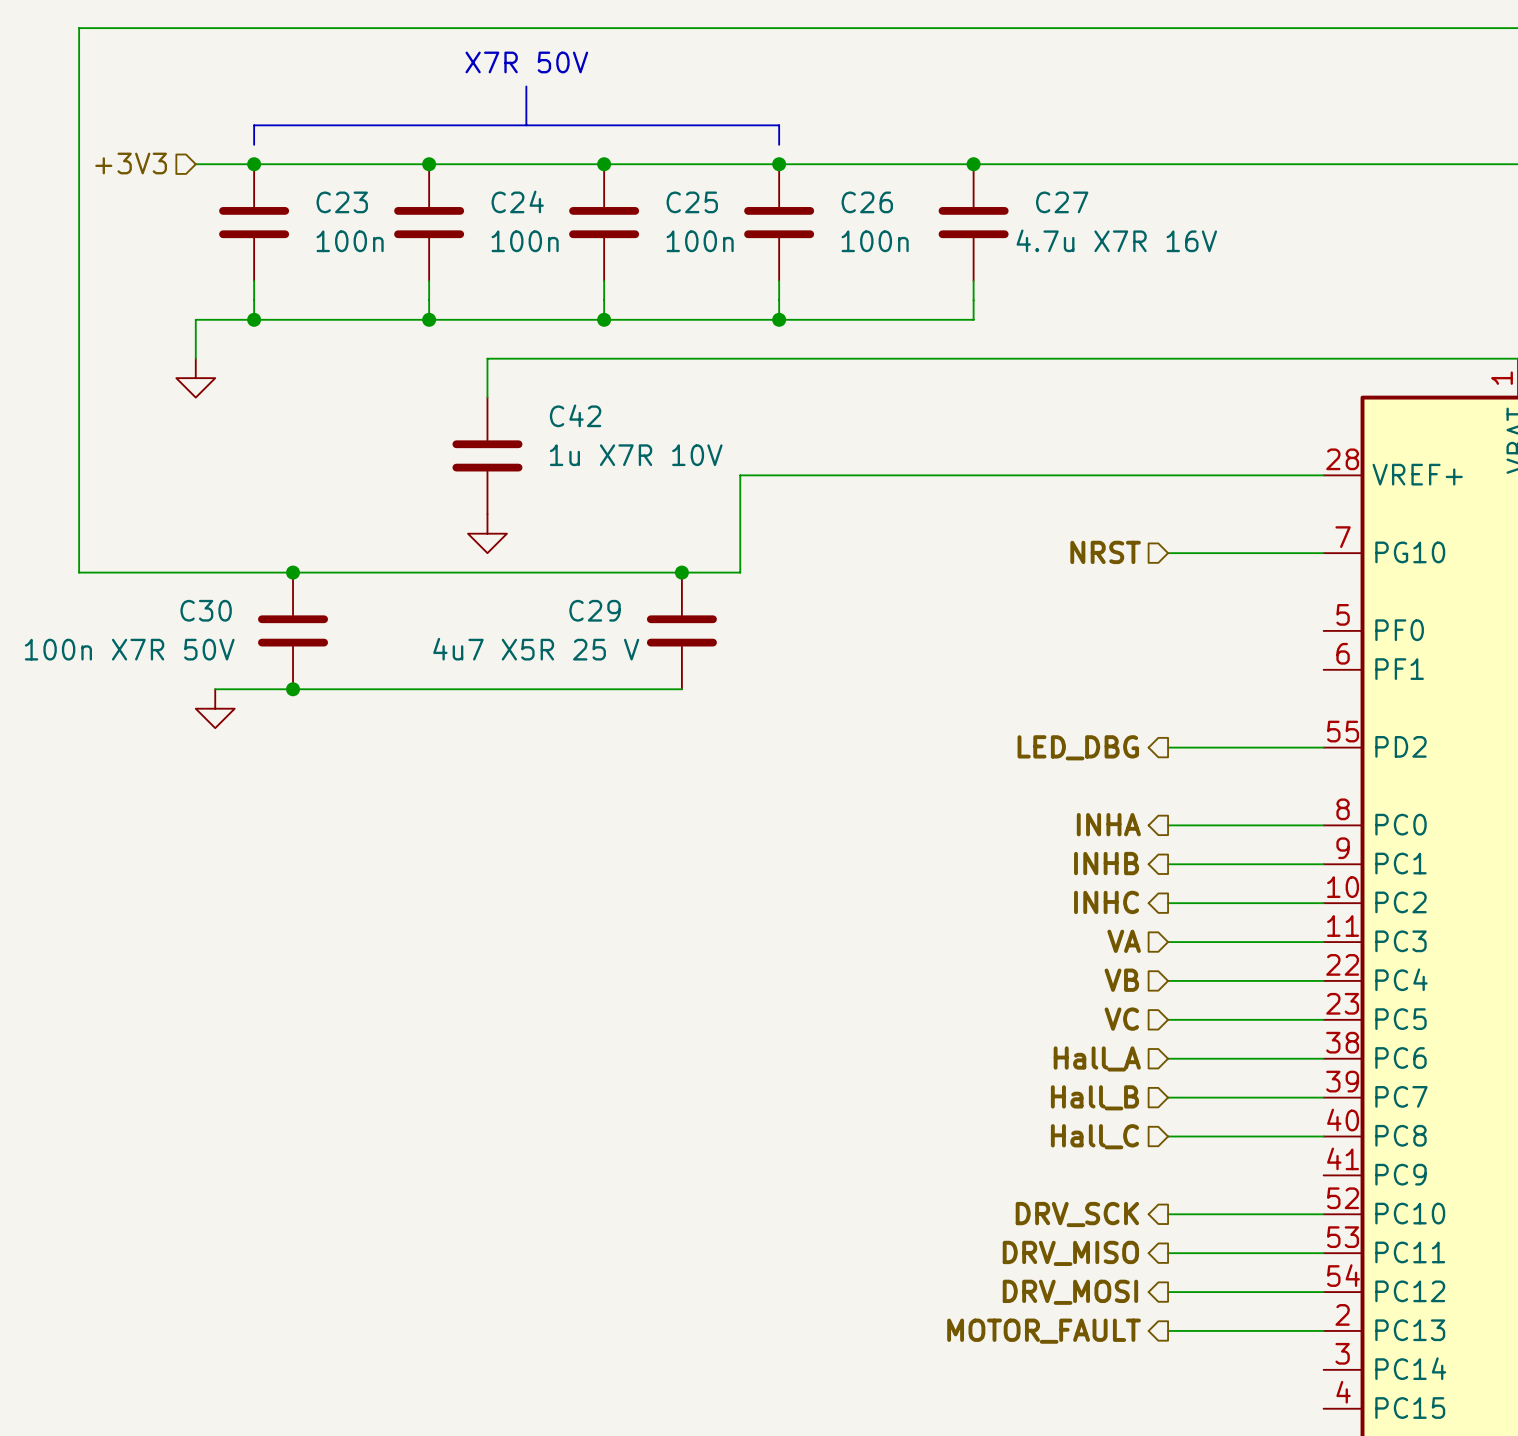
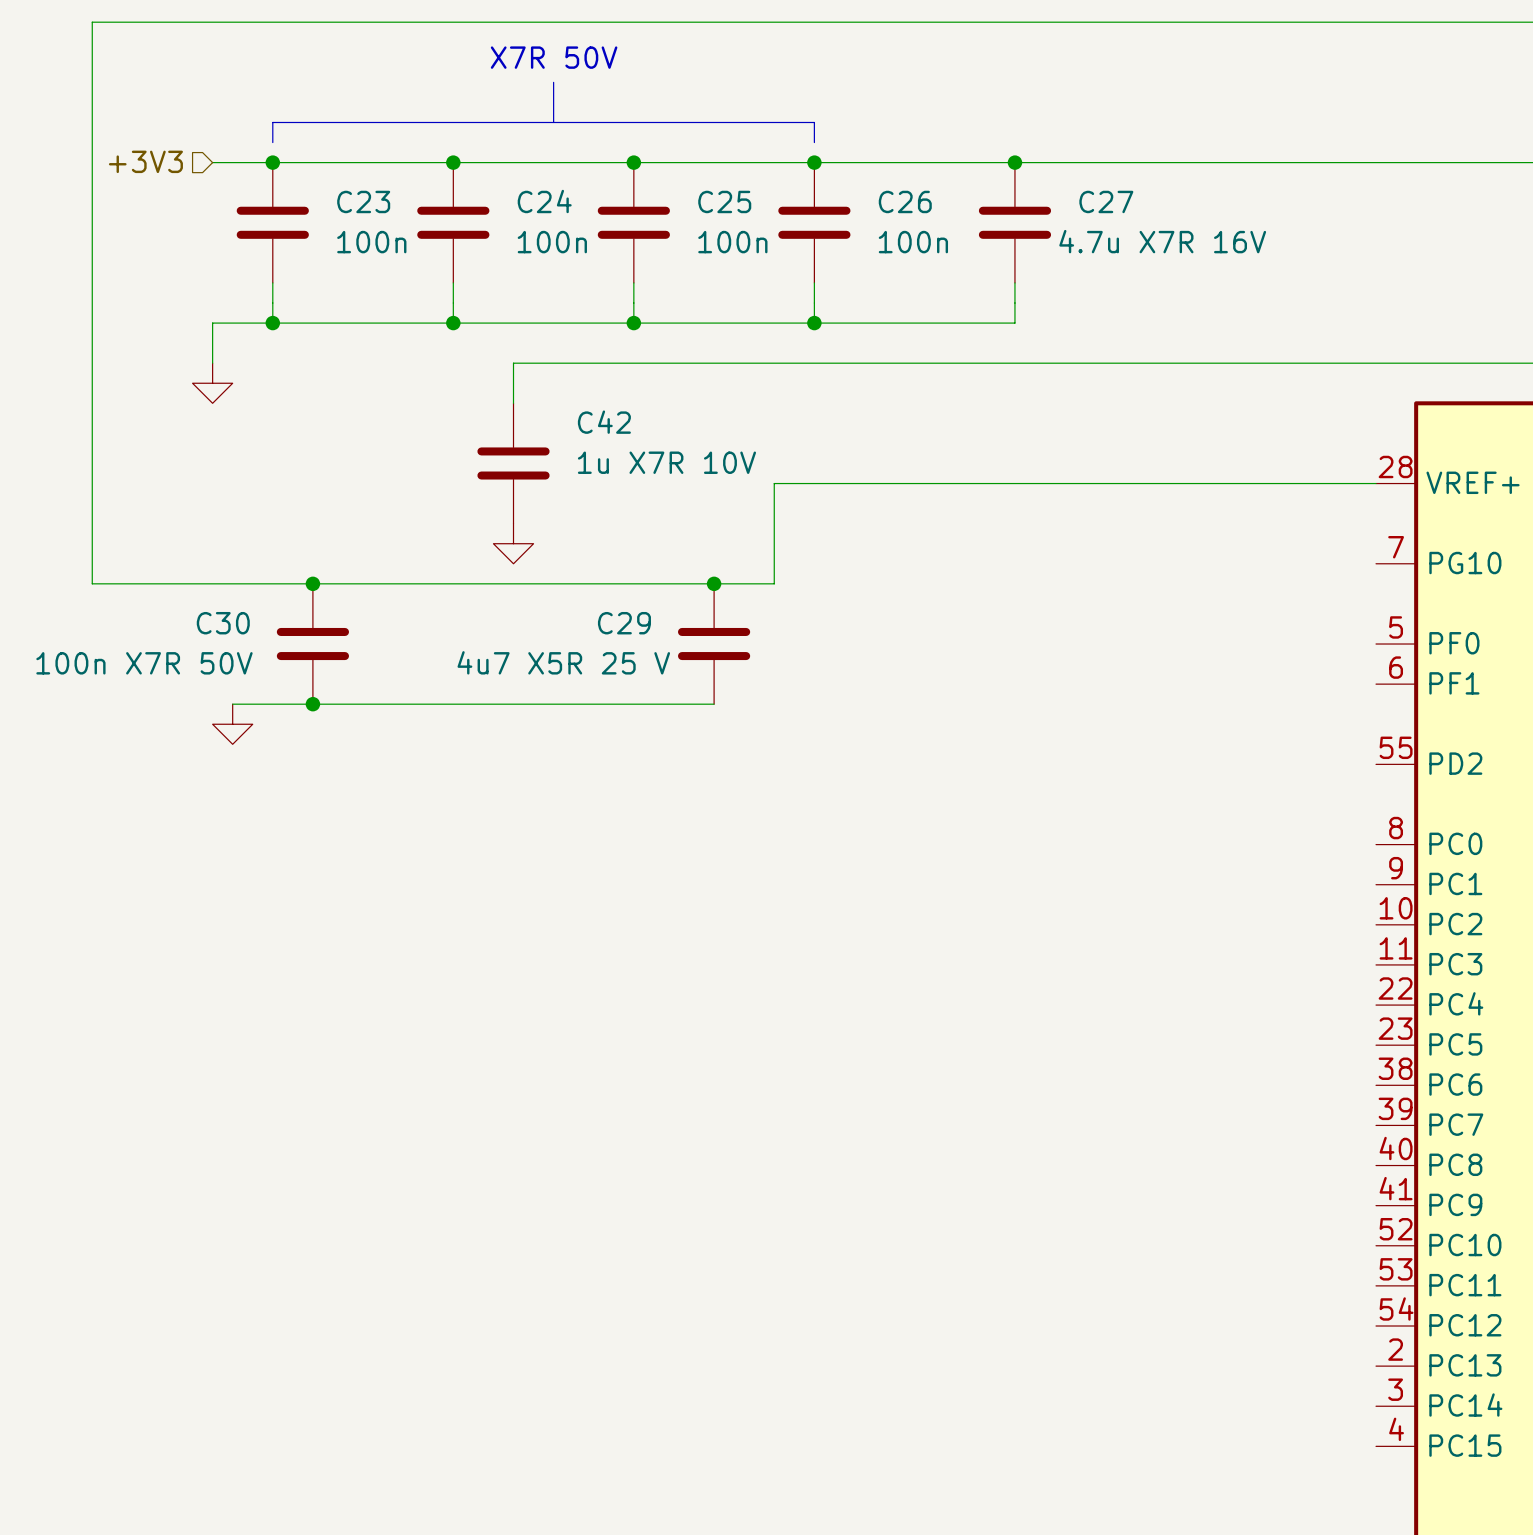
hierarchical label: NRST (1105, 552) -> none
wire: (1168, 553) (1323, 553) -> none
hierarchical label: LED_DBG (1078, 747) -> none
wire: (1168, 747) (1323, 747) -> none
hierarchical label: INHA (1108, 824) -> none
wire: (1168, 825) (1323, 825) -> none
hierarchical label: INHB (1106, 863) -> none
wire: (1168, 864) (1323, 864) -> none
hierarchical label: INHC (1106, 902) -> none
wire: (1168, 903) (1323, 903) -> none
hierarchical label: VA (1124, 941) -> none
wire: (1168, 942) (1323, 942) -> none
hierarchical label: VB (1121, 980) -> none
wire: (1168, 980) (1323, 980) -> none
hierarchical label: VC (1121, 1019) -> none
wire: (1168, 1019) (1323, 1019) -> none
hierarchical label: Hall_A (1097, 1058) -> none
wire: (1168, 1058) (1323, 1058) -> none
hierarchical label: Hall_B (1094, 1097) -> none
wire: (1168, 1097) (1323, 1097) -> none
hierarchical label: Hall_C (1094, 1136) -> none
wire: (1168, 1136) (1323, 1136) -> none
hierarchical label: DRV_SCK (1077, 1214) -> none
wire: (1168, 1214) (1323, 1214) -> none
hierarchical label: DRV_MISO (1070, 1253) -> none
wire: (1168, 1253) (1323, 1253) -> none
hierarchical label: DRV_MOSI (1070, 1292) -> none
wire: (1168, 1292) (1323, 1292) -> none
wire: (1168, 1330) (1323, 1330) -> none
hierarchical label: MOTOR_FAULT (1044, 1331) -> none

